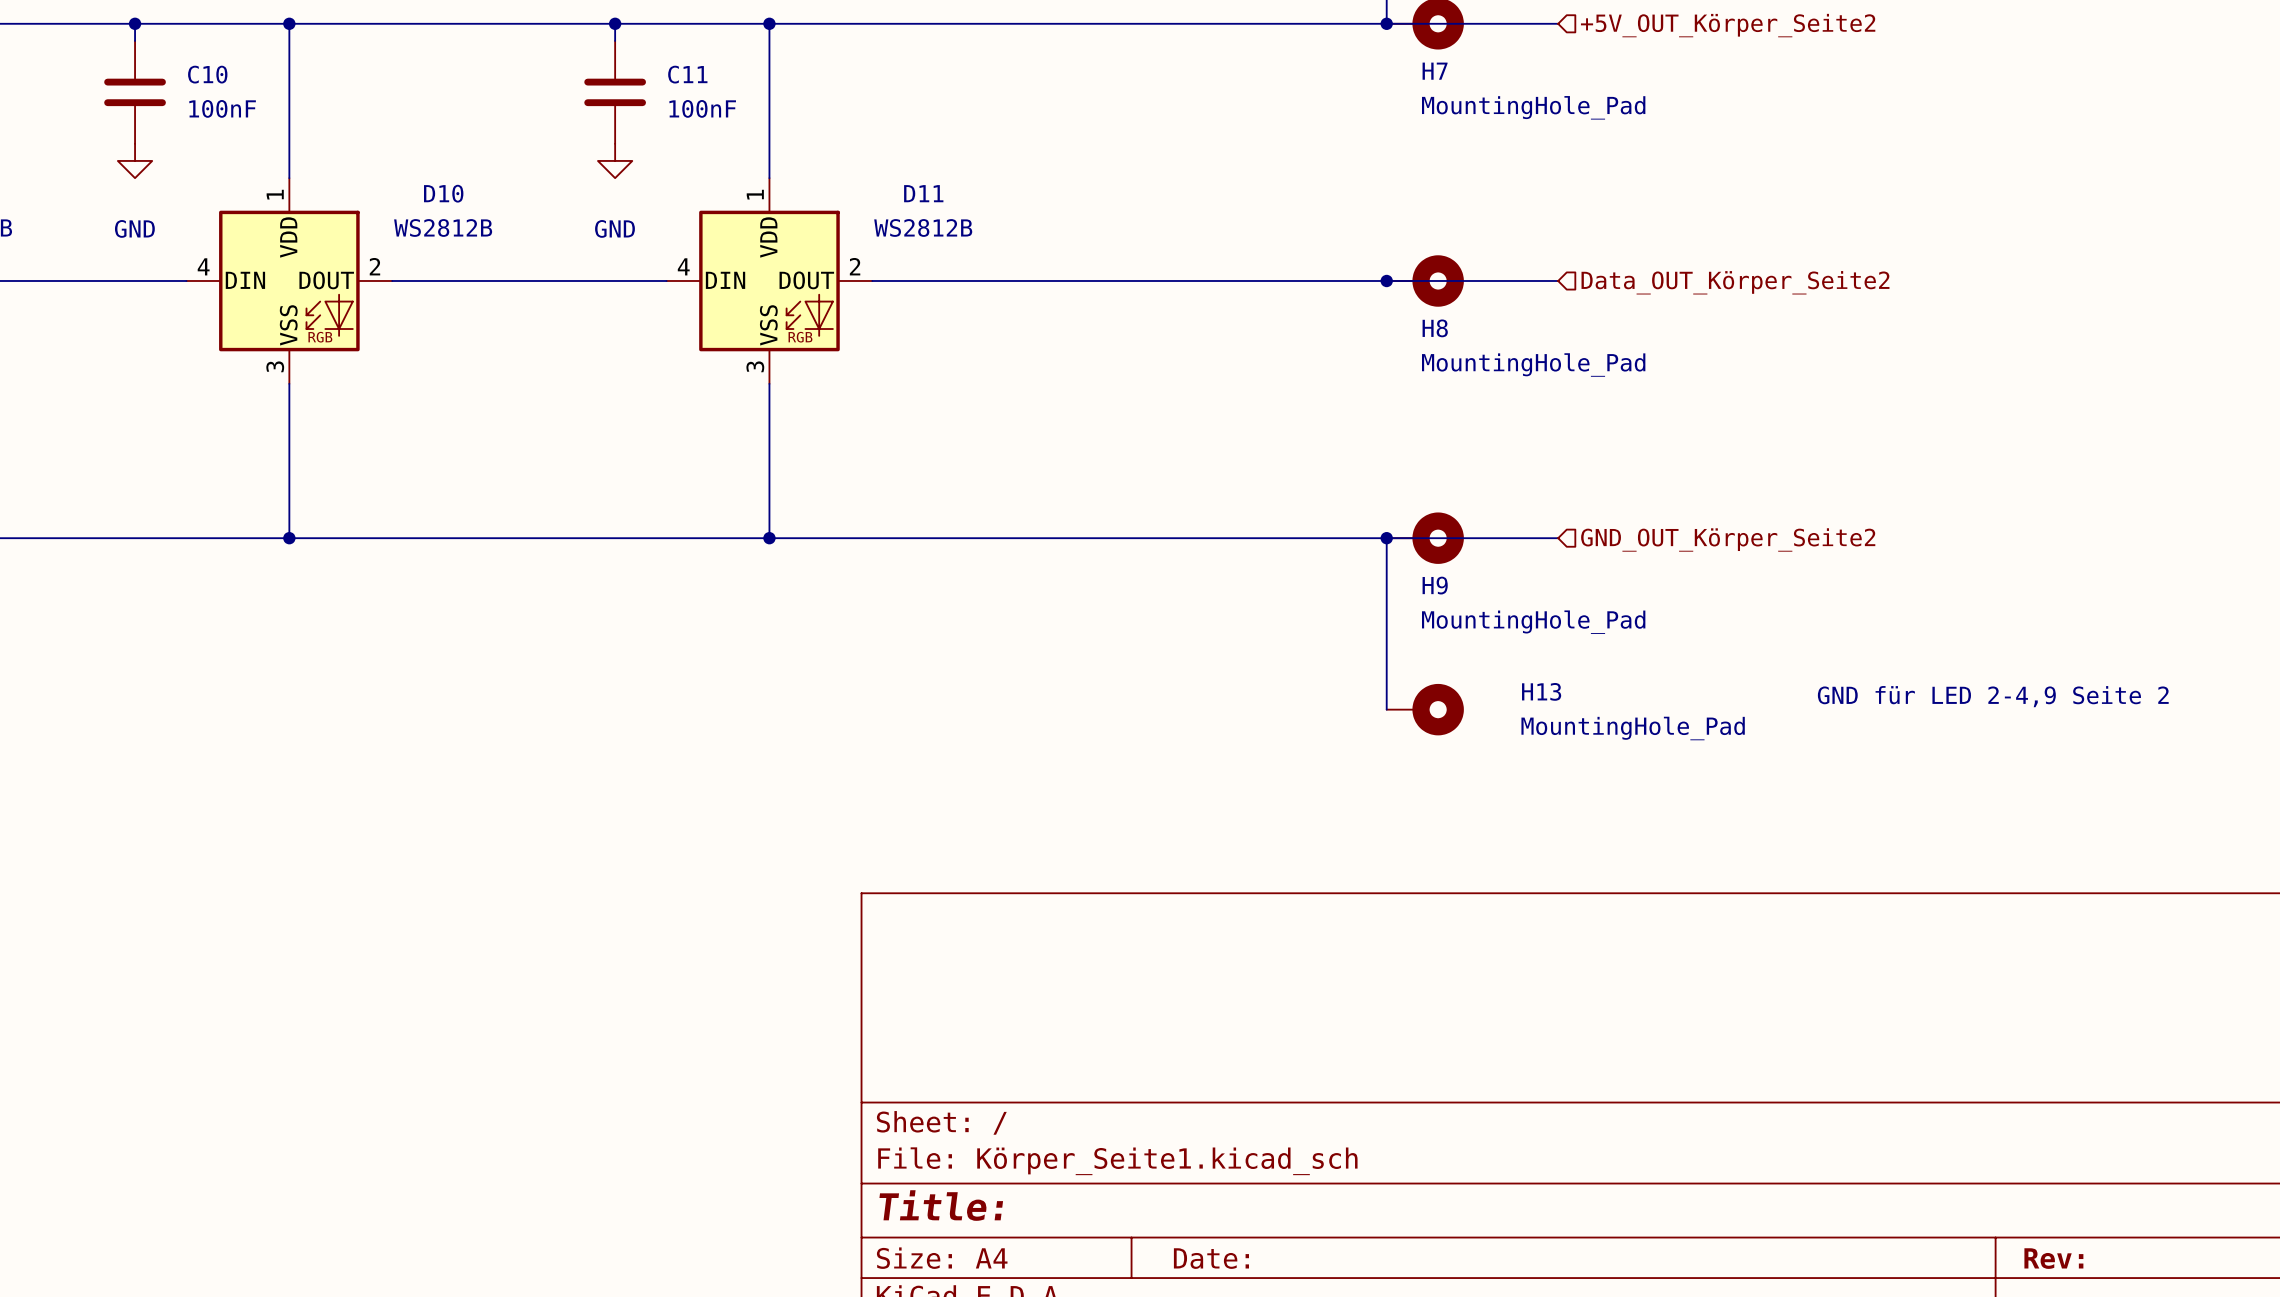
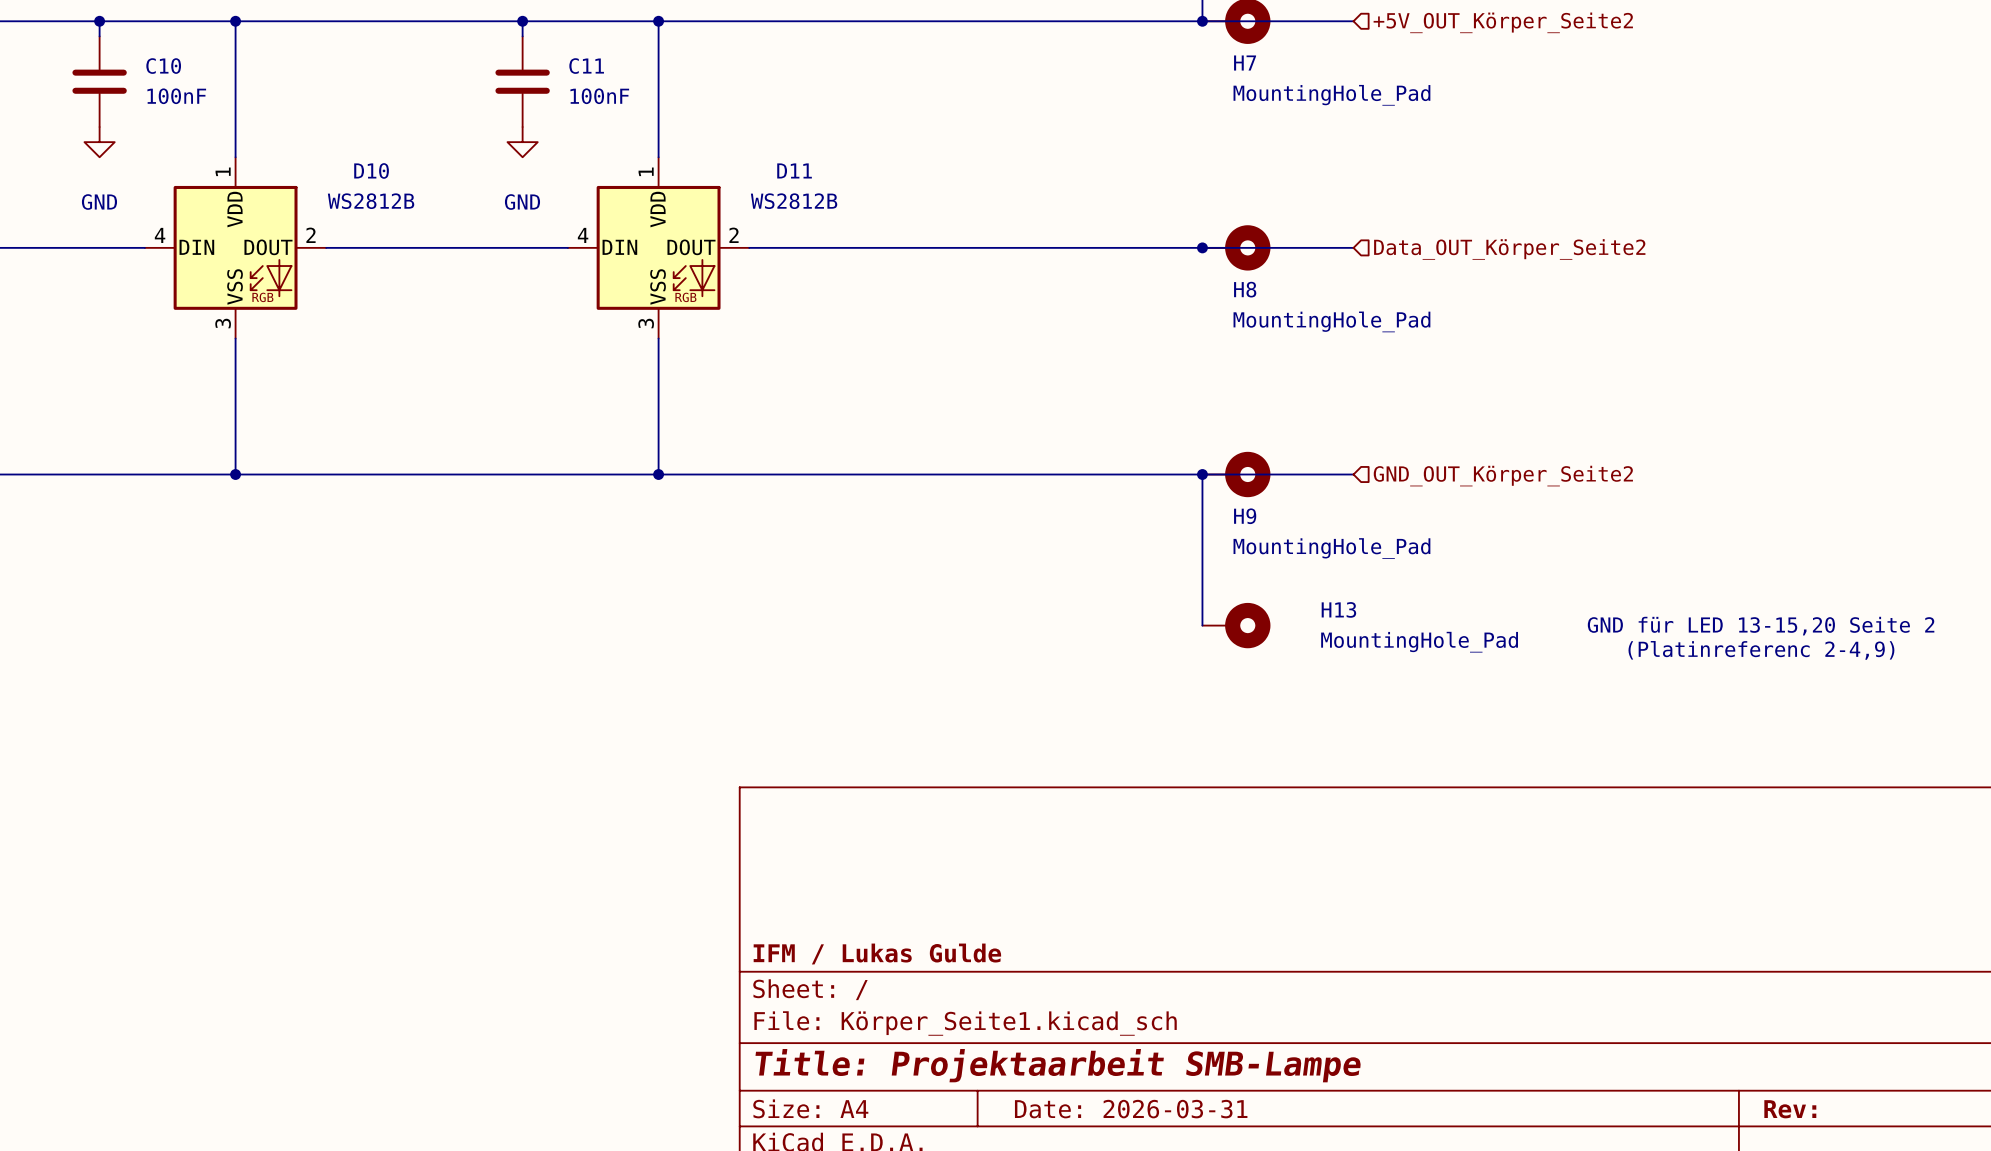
text: GND für LED 2-4,9 Seite 2 (1993, 696) -> GND für LED 13-15,20 Seite 2 (1761, 626)
text: none -> (Platinreferenc 2-4,9) (1761, 650)
title block: none -> IFM / Lukas Gulde (877, 954)
title block: Title: (941, 1205) -> Title: Projektaarbeit SMB-Lampe (1058, 1065)
title block: Date: (1211, 1258) -> Date: 2026-03-31 (1131, 1109)

